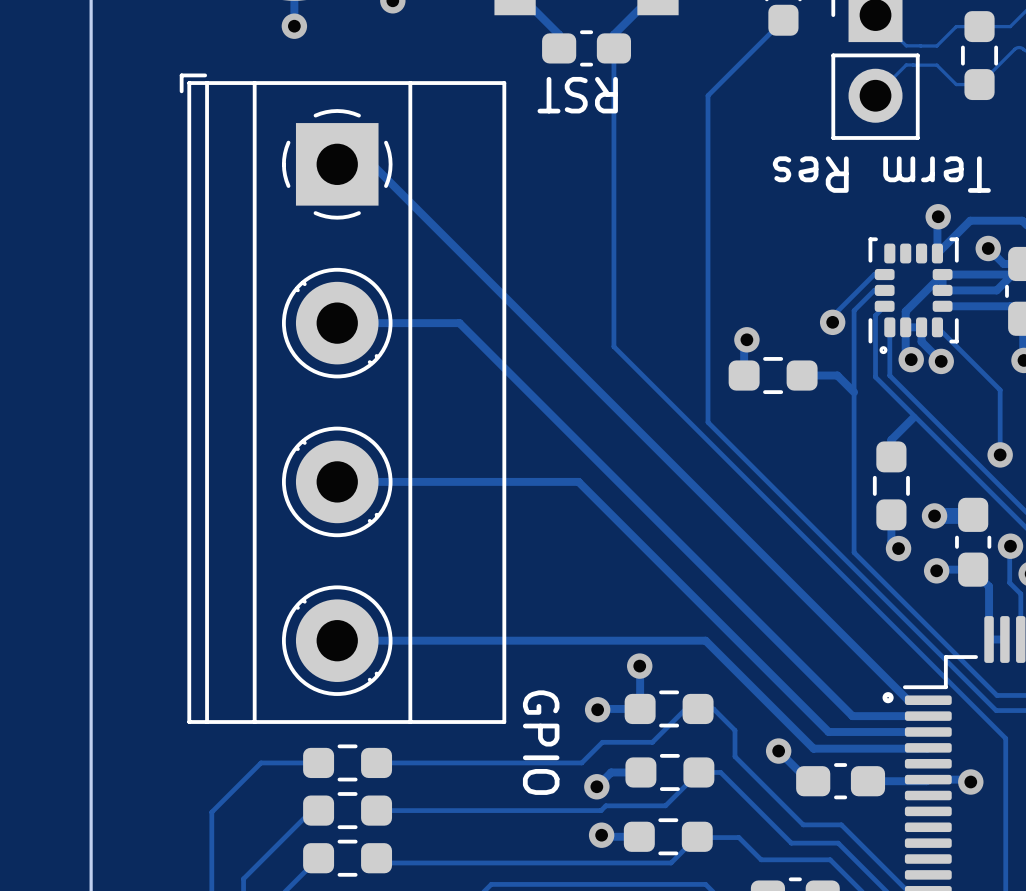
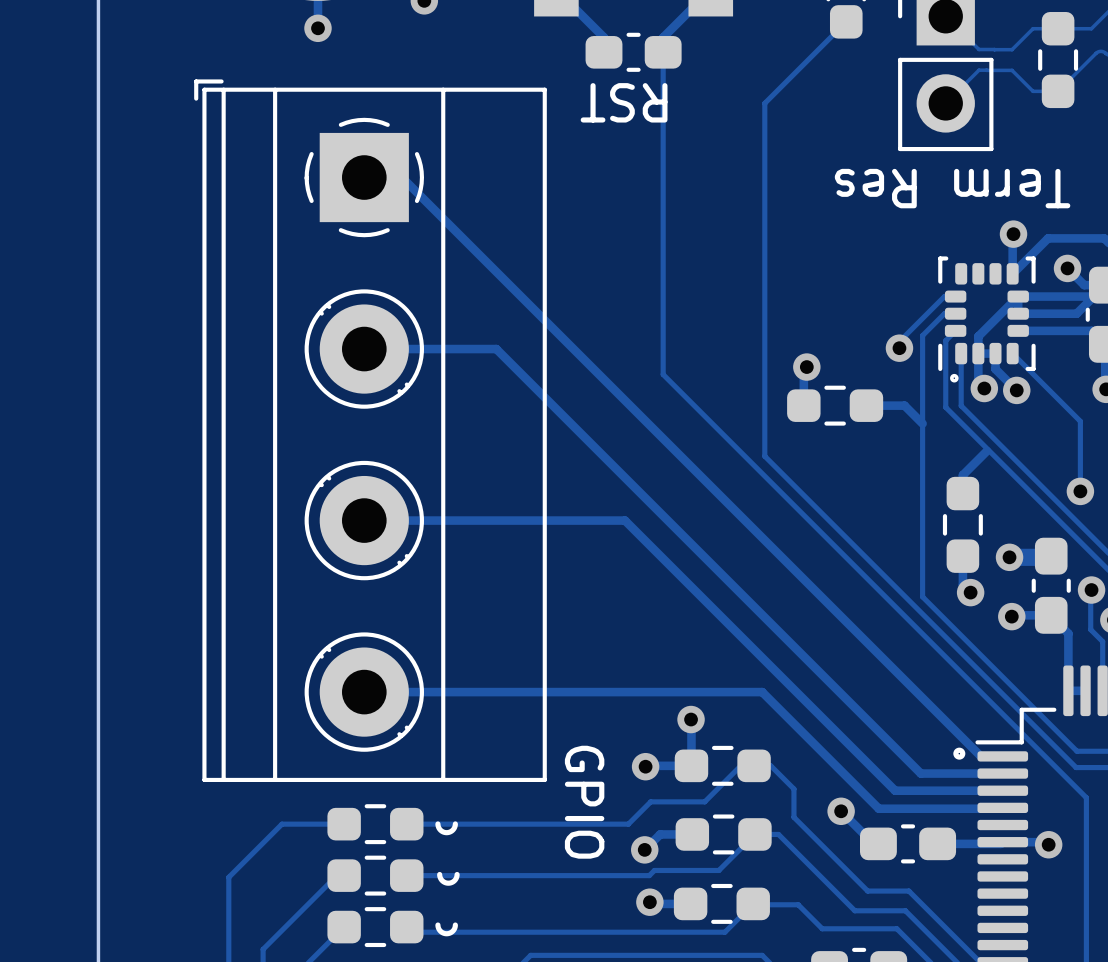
line: none -> (437, 823) (440, 830) (446, 832) (452, 830) (455, 823)
line: none -> (439, 874) (442, 881) (448, 883) (454, 881) (457, 874)
line: none -> (437, 925) (440, 930) (446, 933) (453, 930) (455, 925)

